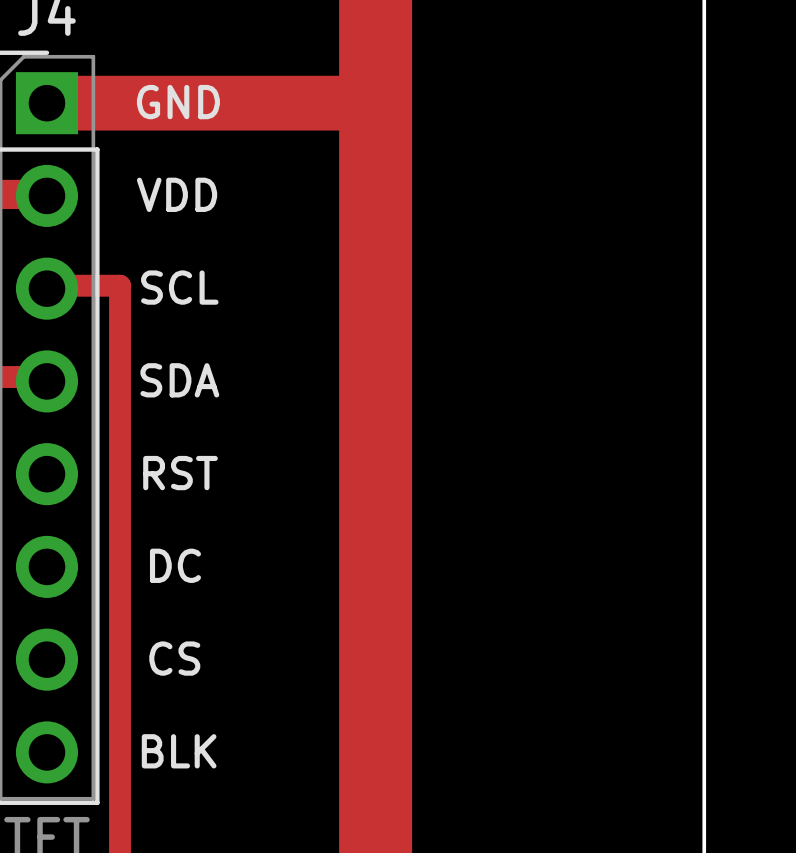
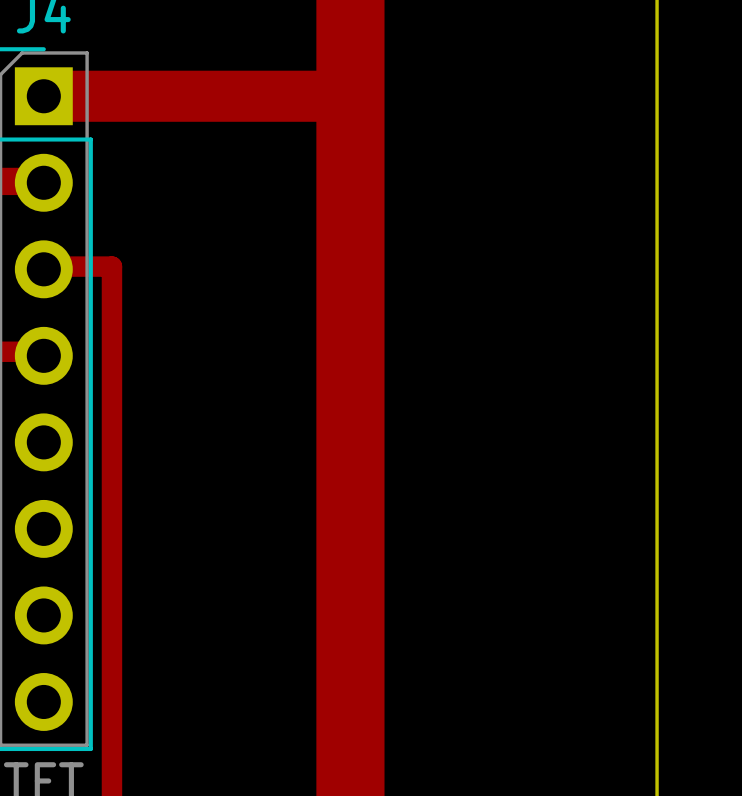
text: GND (178, 102) -> none
text: VDD (177, 194) -> none
text: SCL (179, 287) -> none
text: SDA (179, 380) -> none
text: RST (180, 473) -> none
text: DC (175, 565) -> none
text: CS (174, 658) -> none
text: BLK (179, 751) -> none

